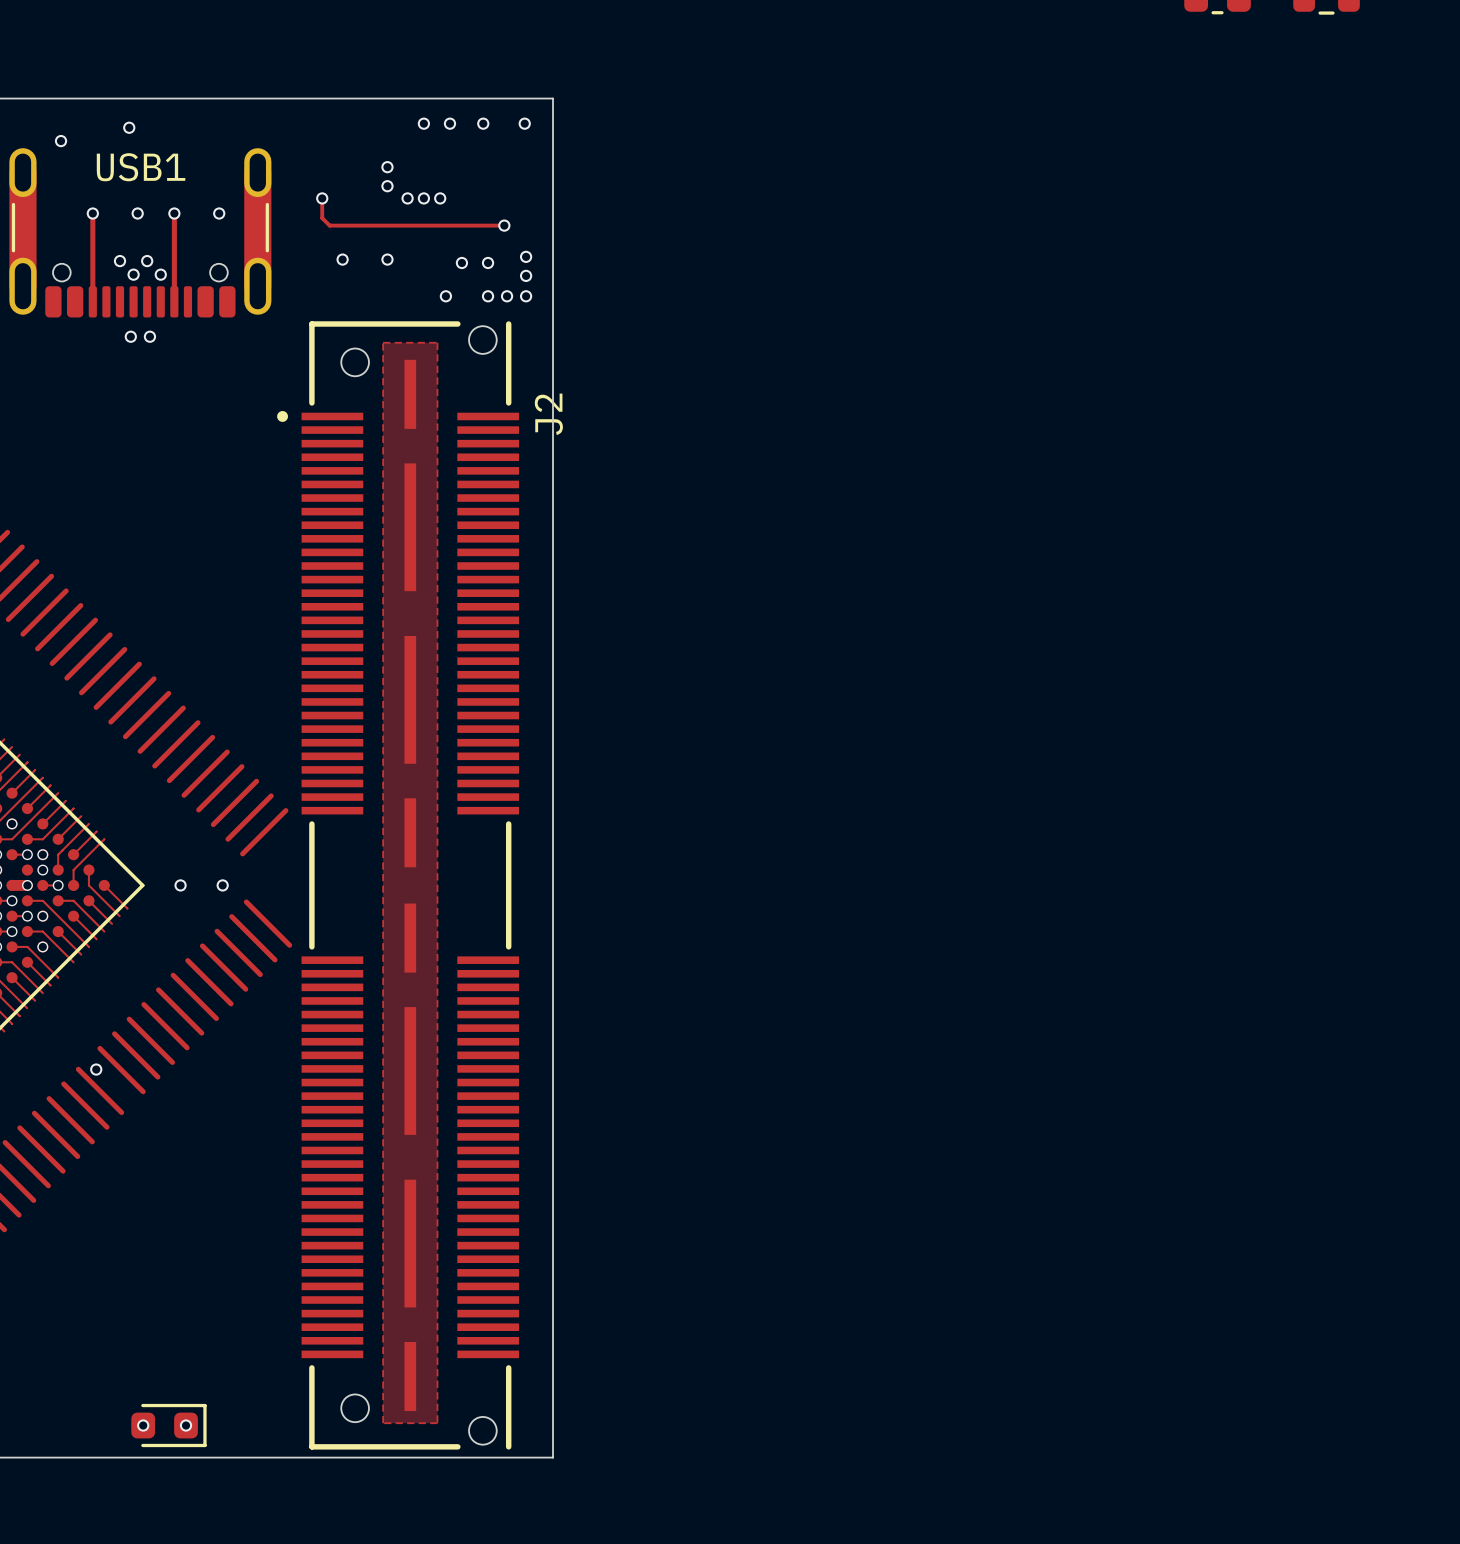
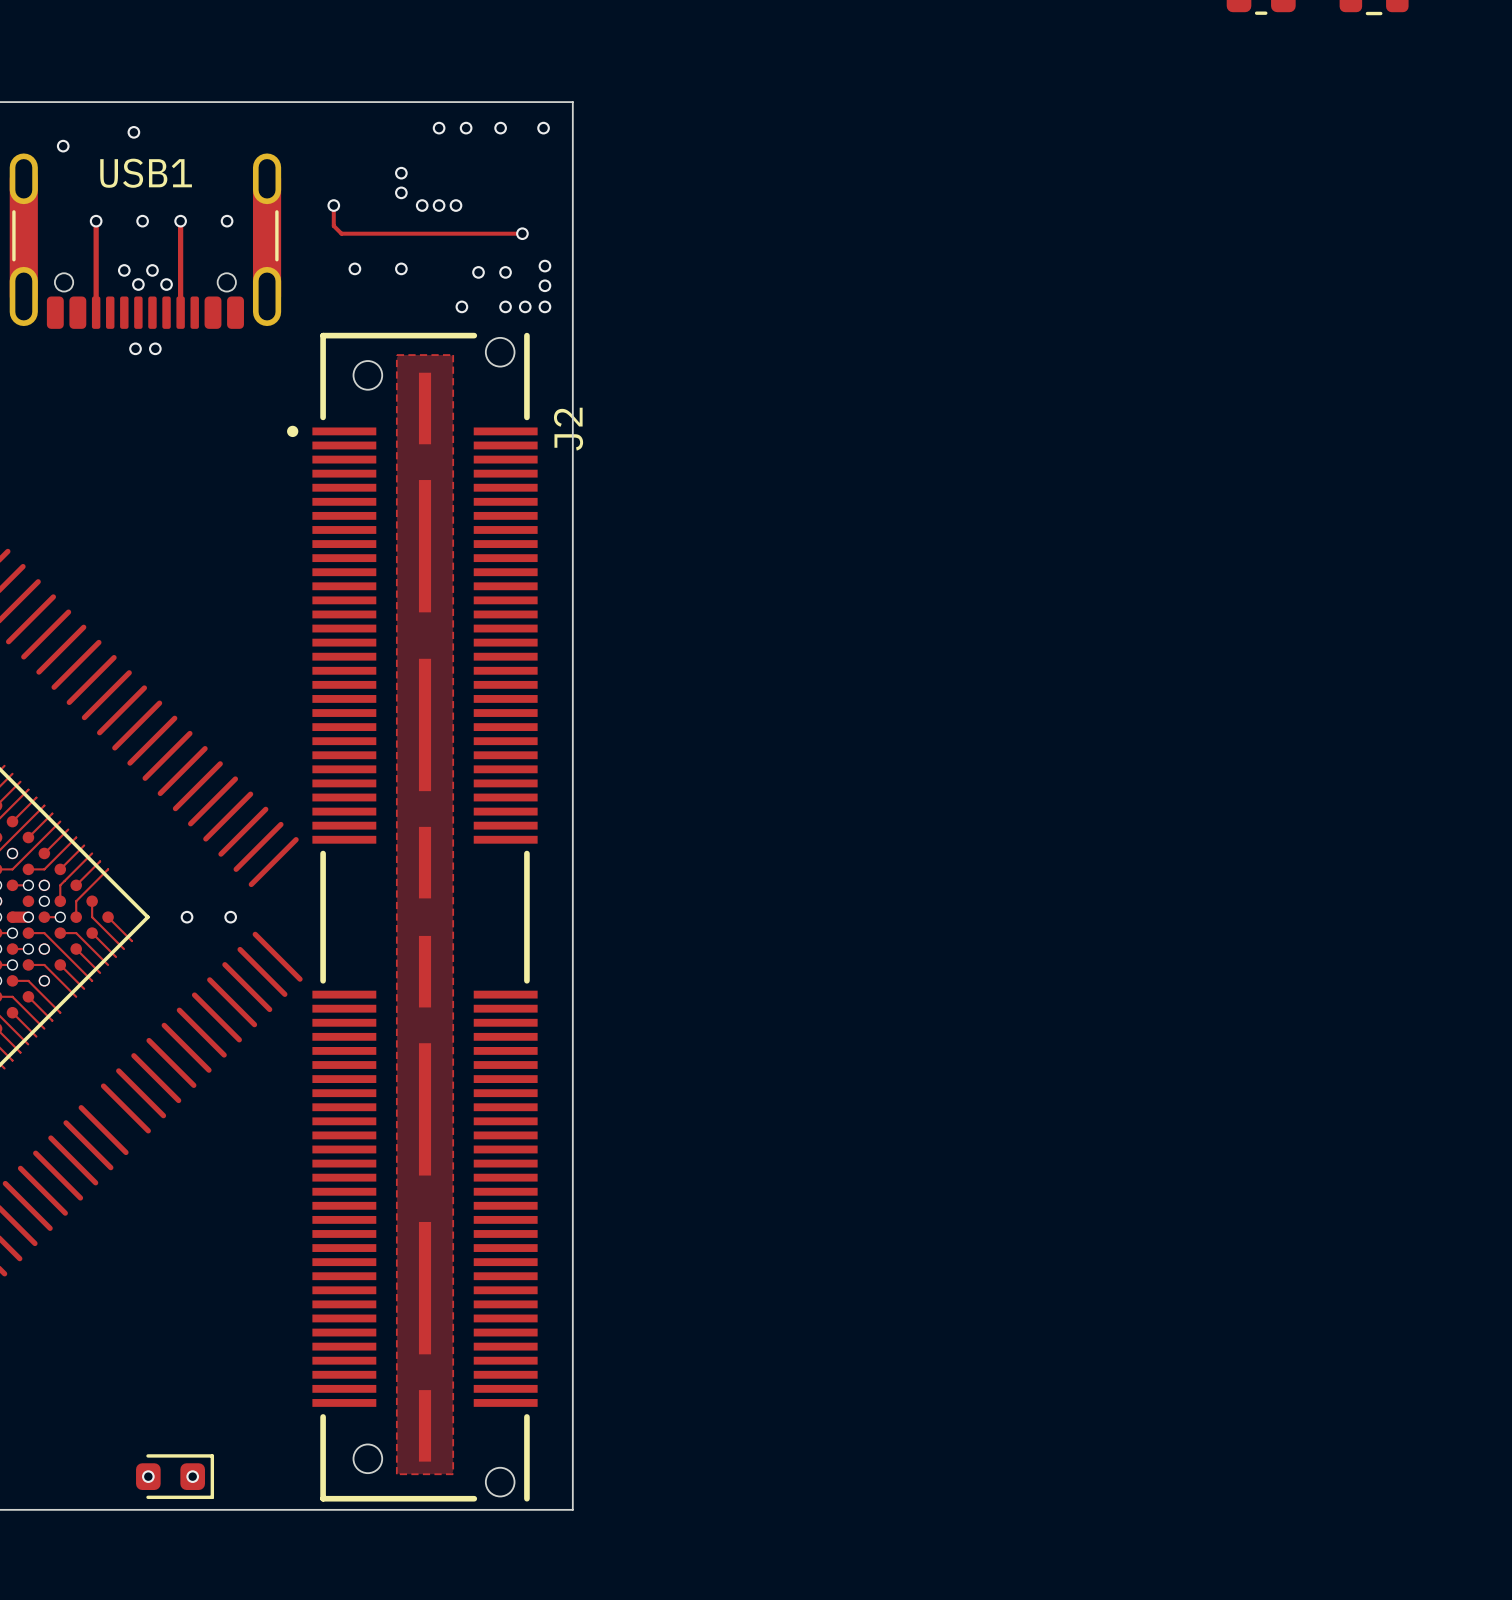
via: (96, 1069) -> none

